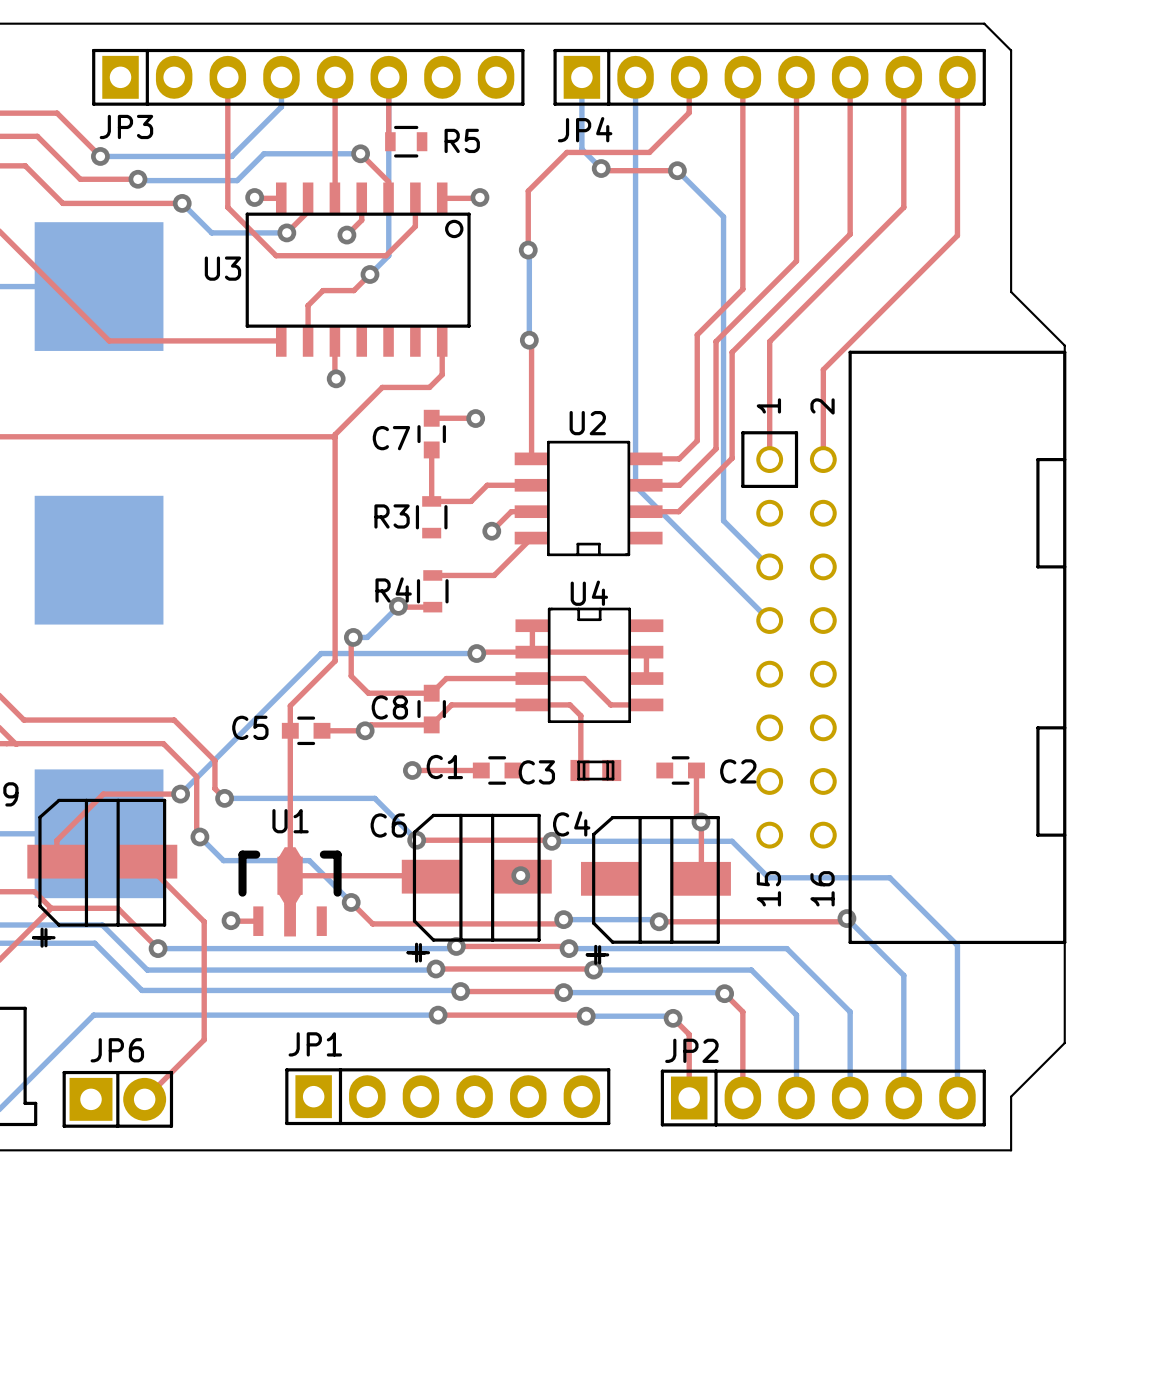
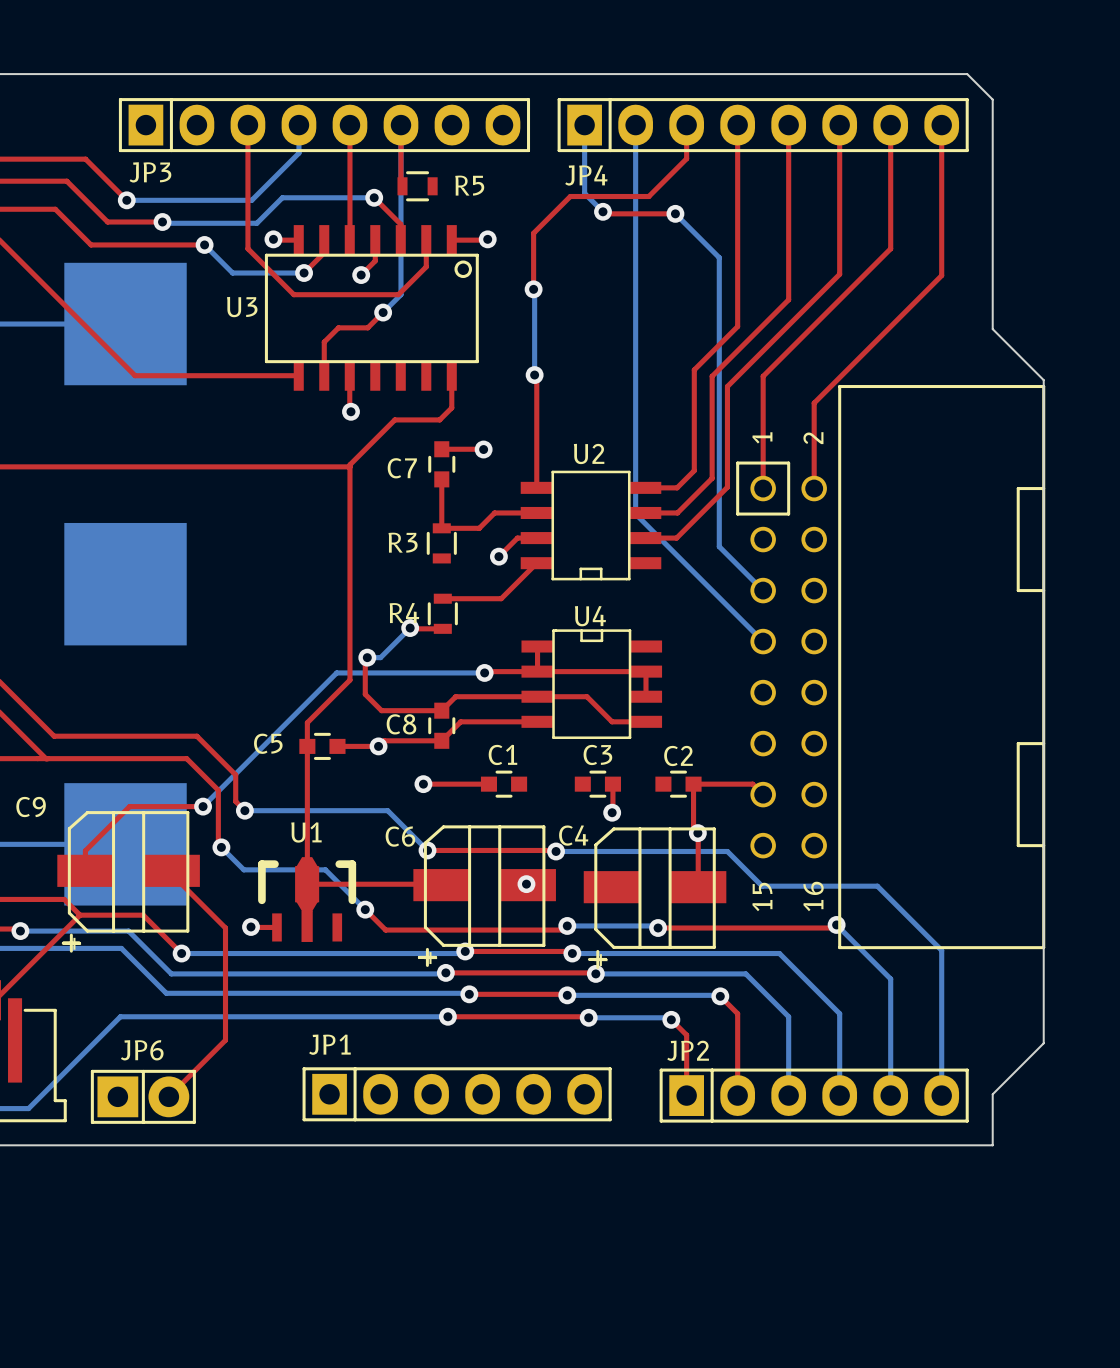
top track: (532, 704) (570, 704) (580, 715) (580, 769) -> none
C3 footprint: [570, 759, 622, 782] -> [574, 770, 621, 798]
C1 name position: C1 (444, 767) -> C1 (502, 754)
top track: none -> (612, 784) (612, 812)
top track: none -> (693, 784) (752, 784) (763, 794)
C2 name position: C2 (738, 771) -> C2 (678, 755)
C3 name position: C3 (536, 772) -> C3 (597, 754)
via: none -> (612, 812)

